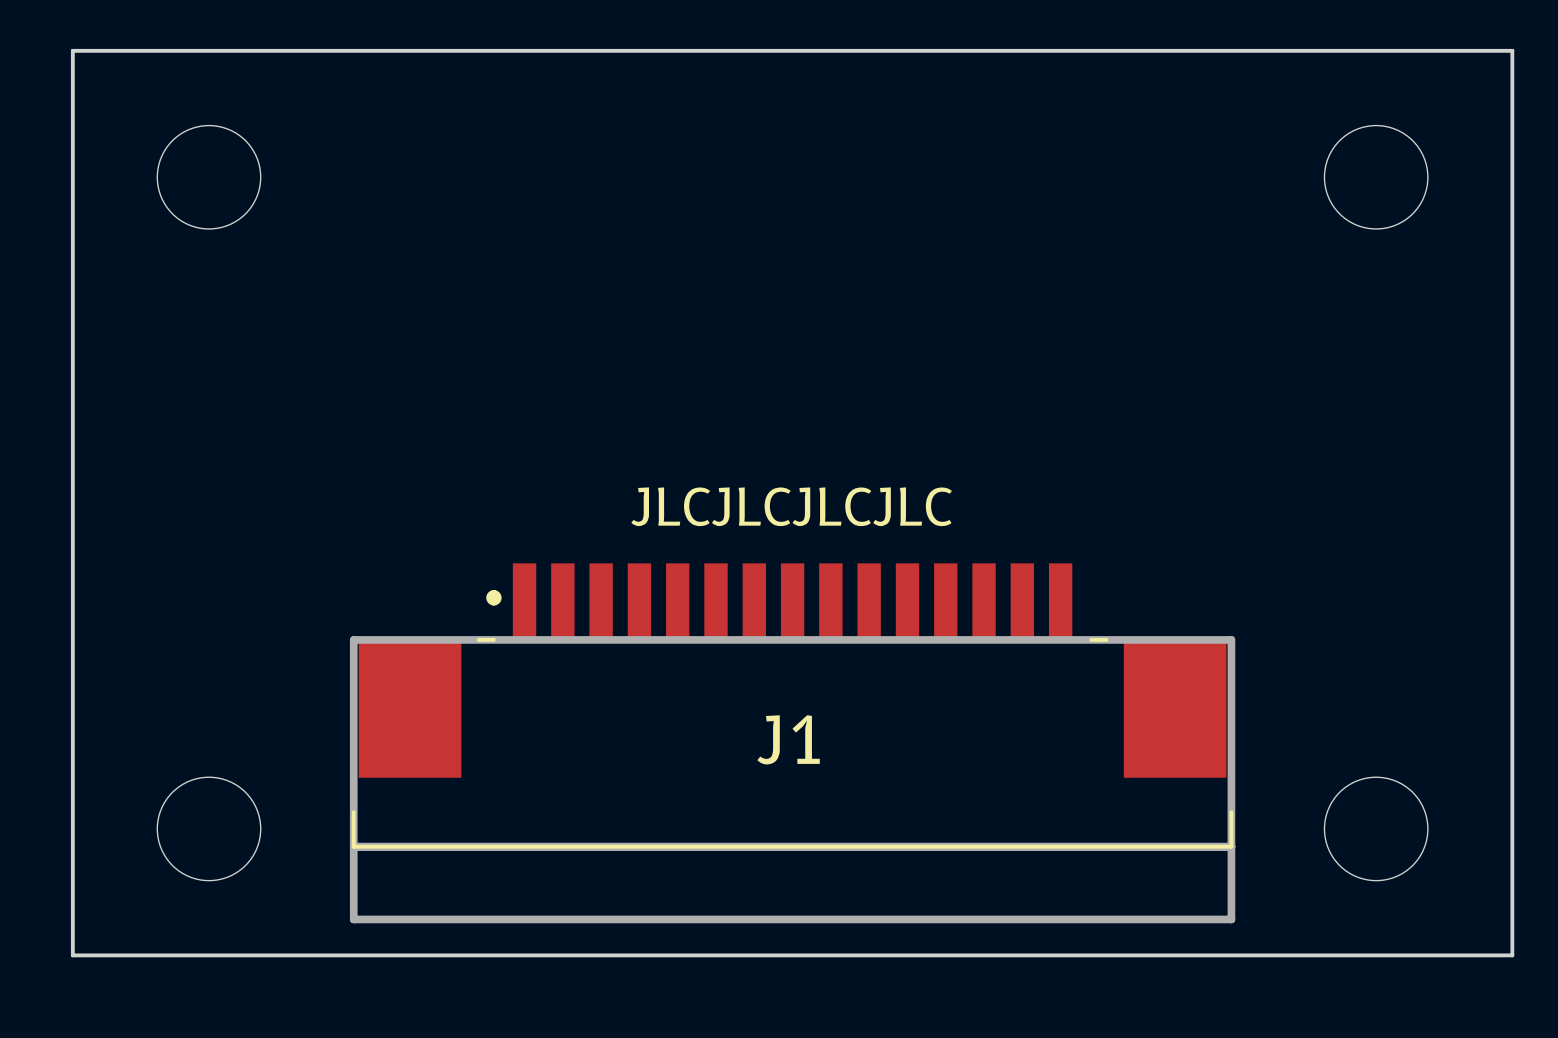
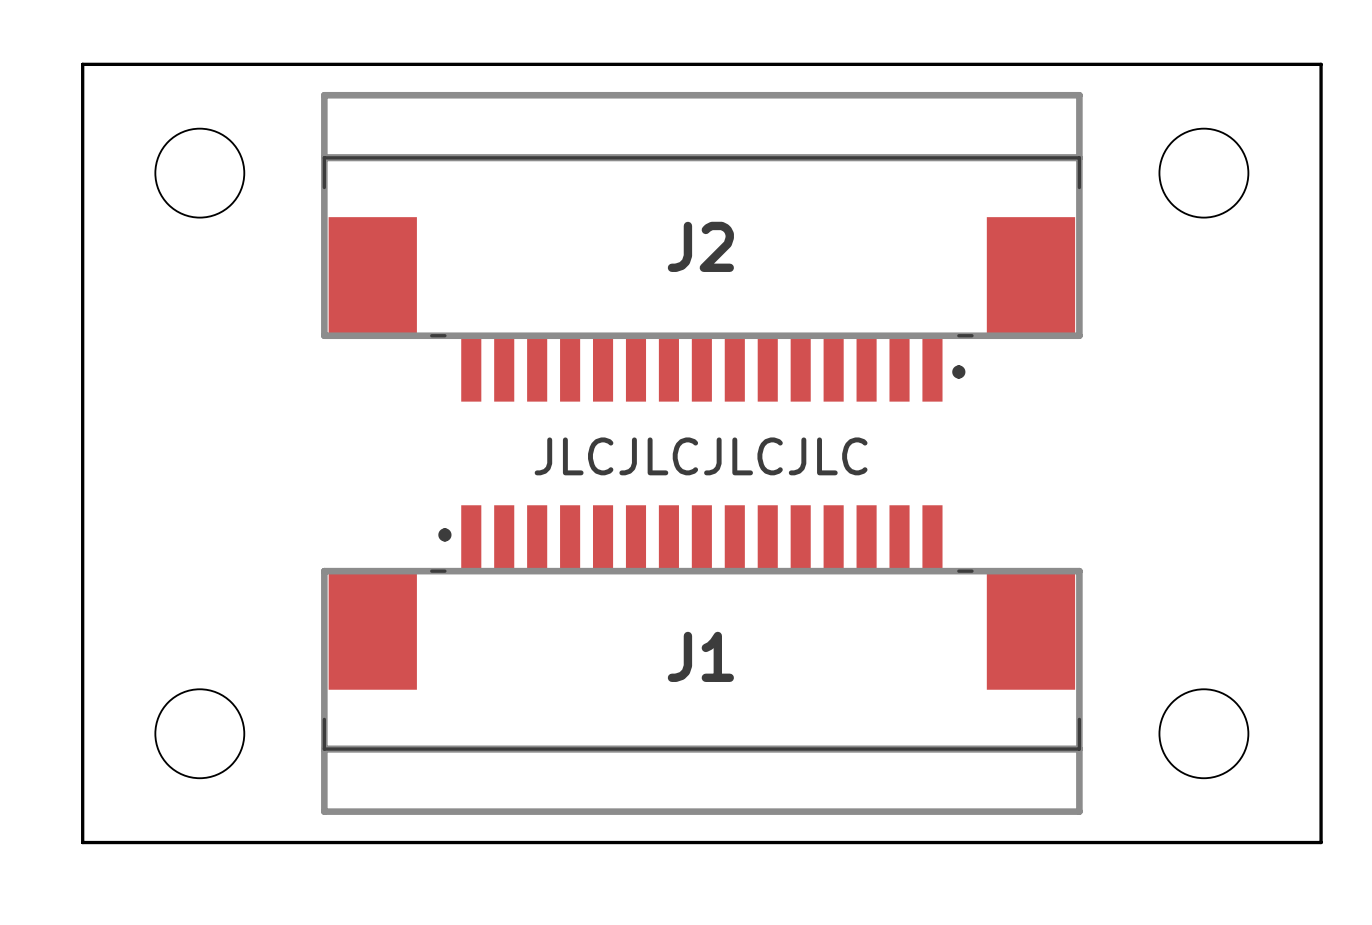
J2: none -> (701, 246)

